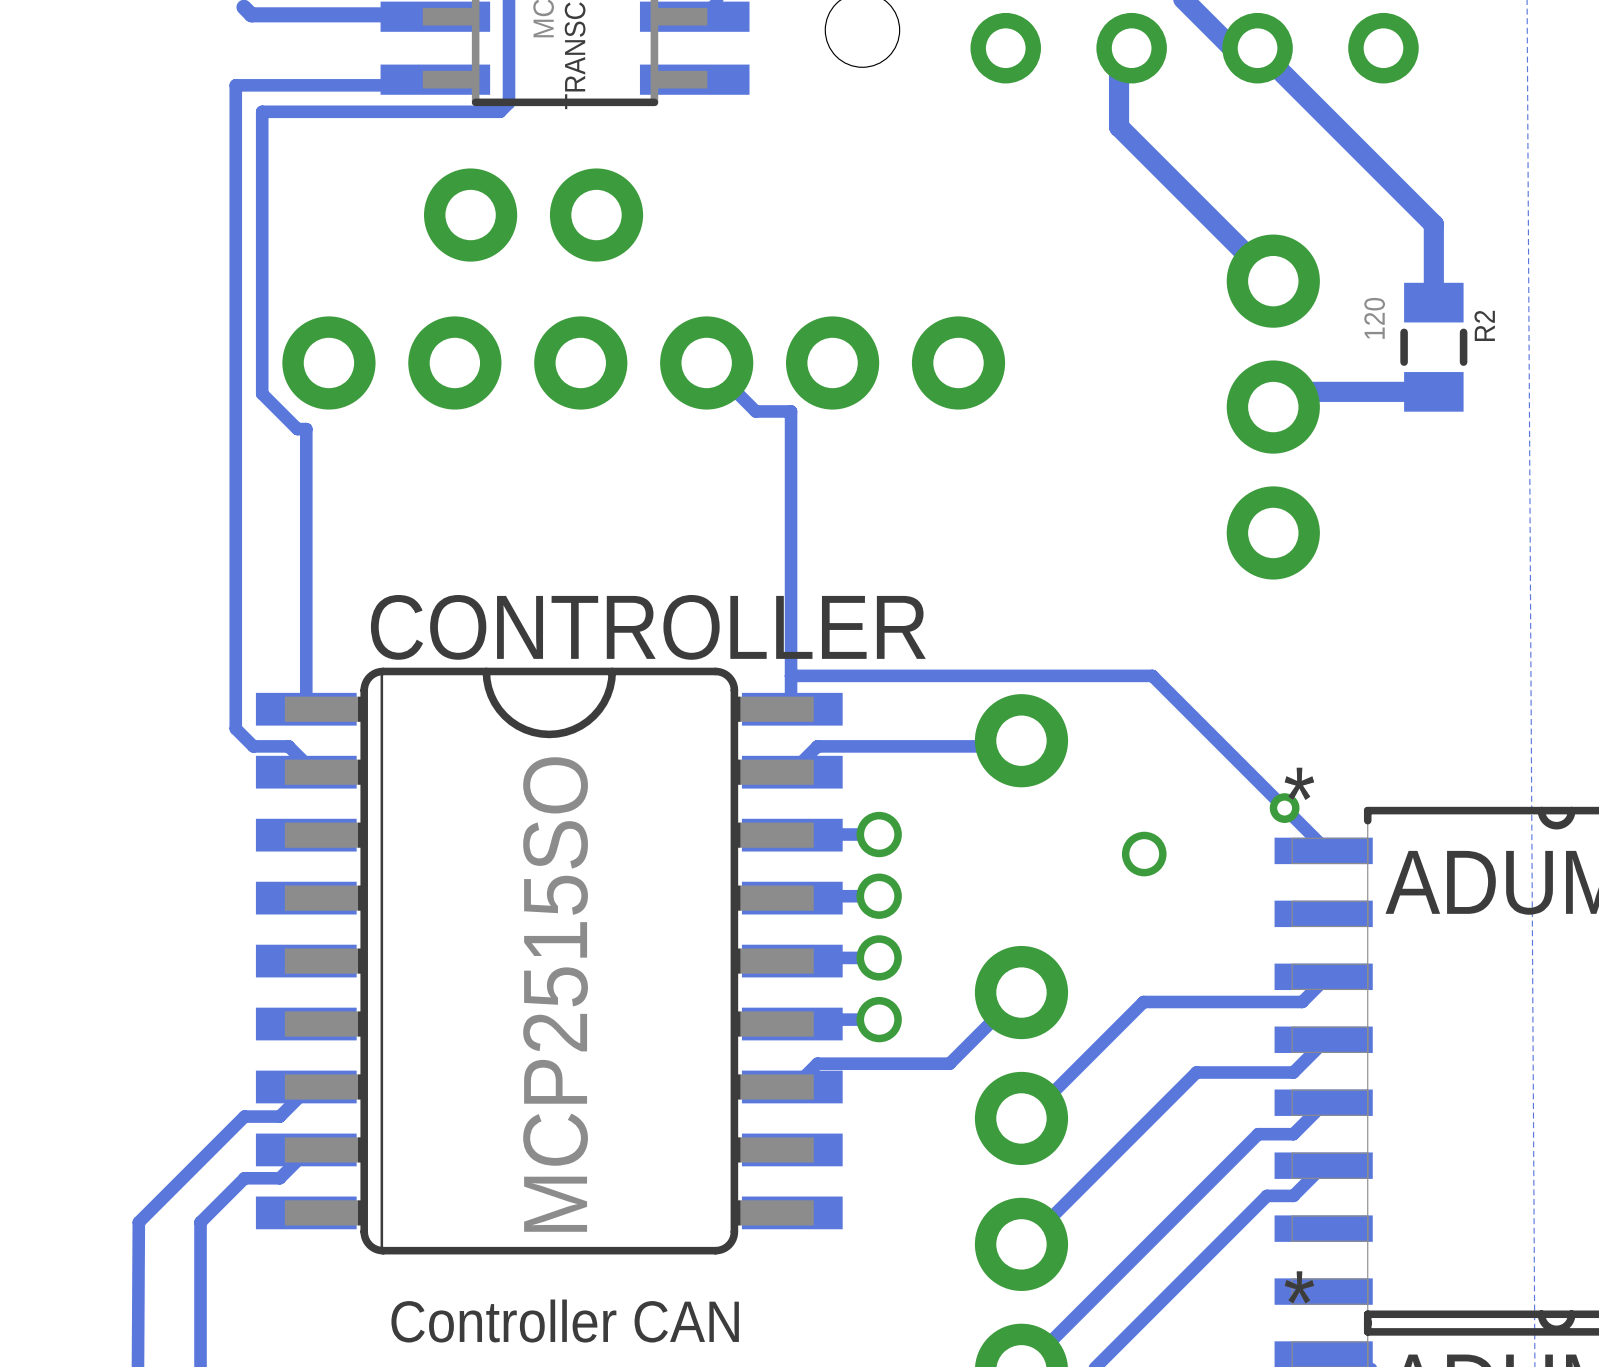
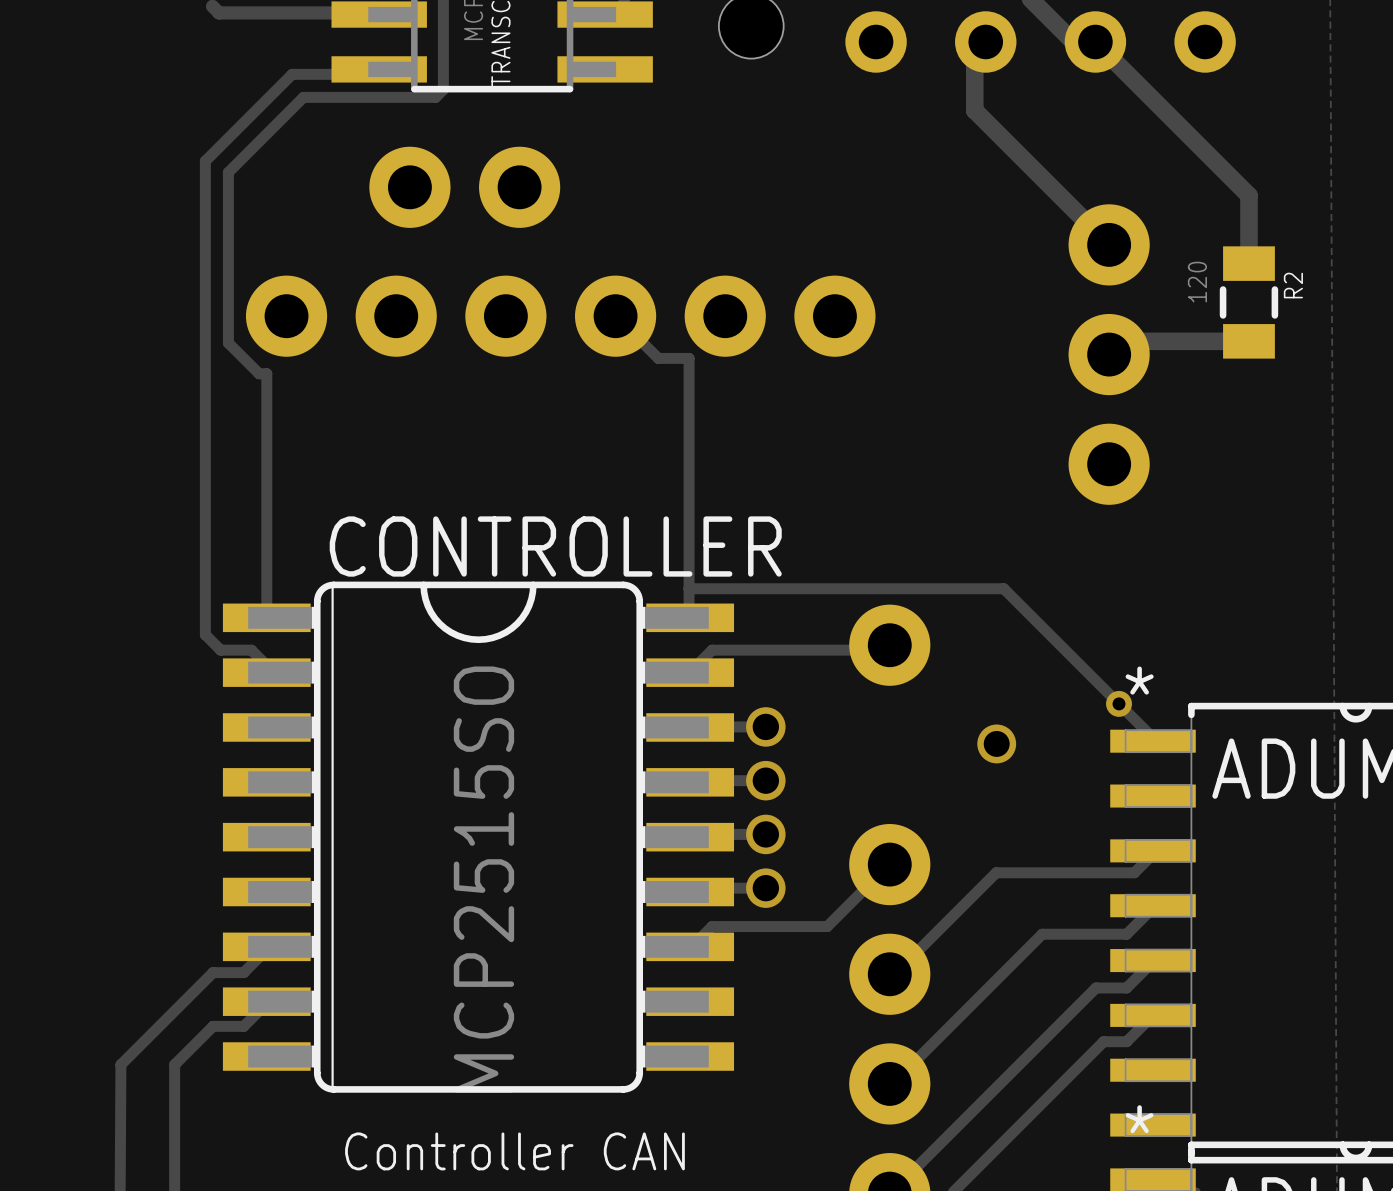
track: (335, 85) (235, 85) (235, 185) -> (292, 74) (205, 161)
track: (348, 111) (262, 111) (262, 197) -> (303, 97) (228, 172)

